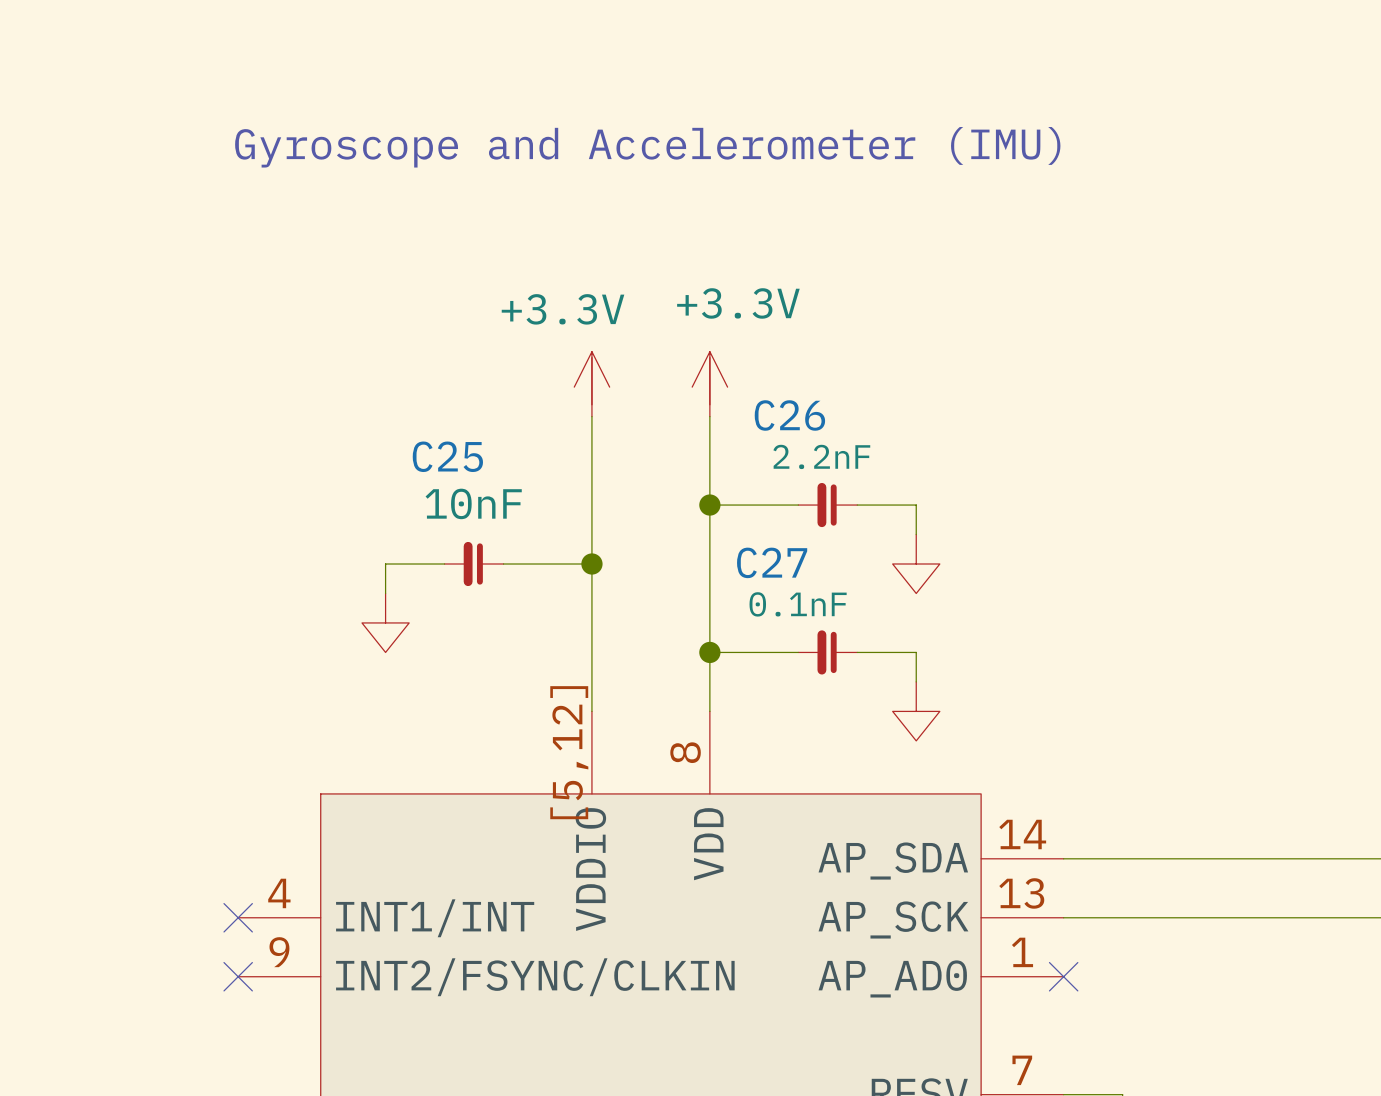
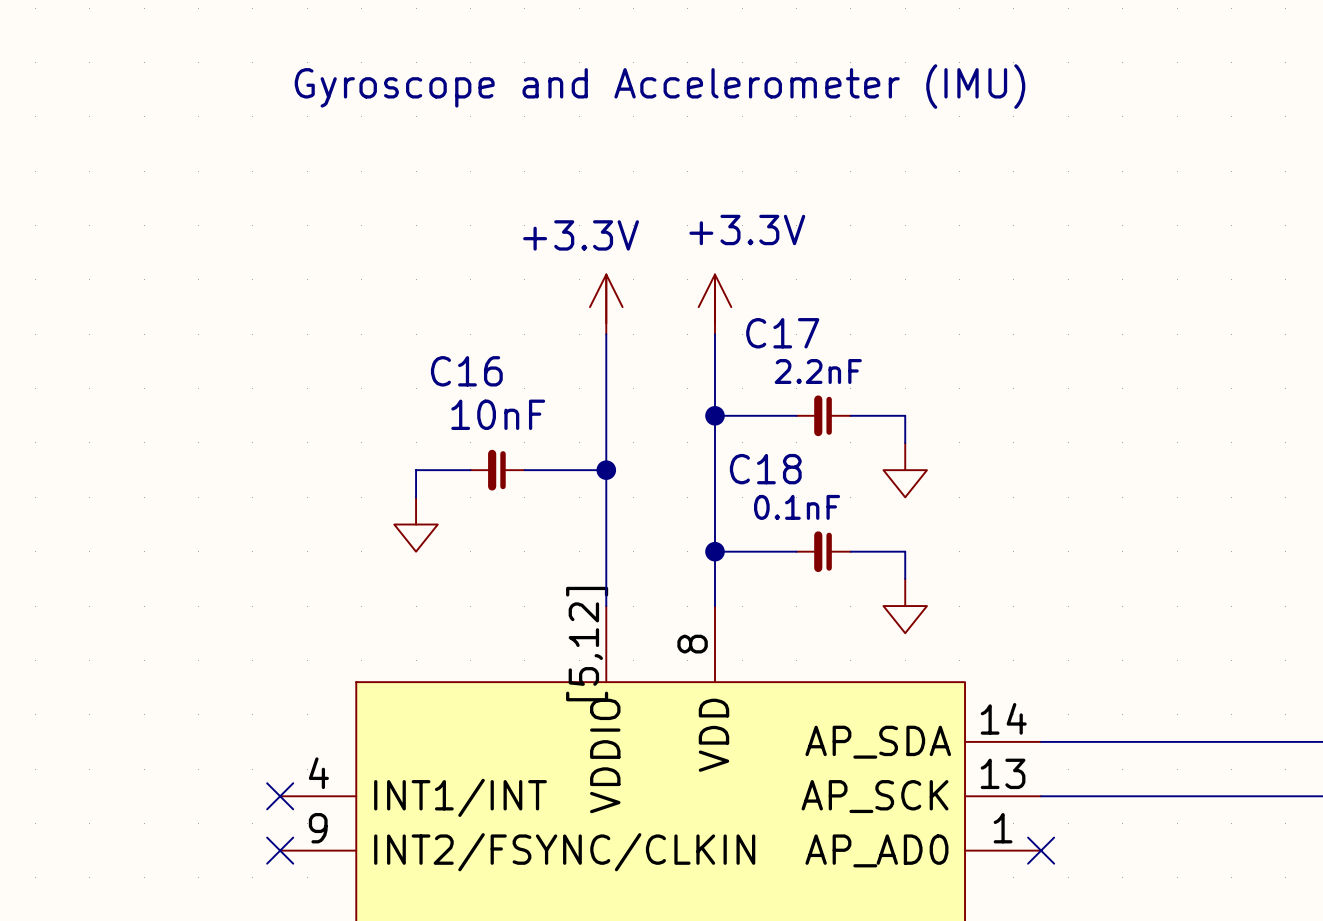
C26 name: C26 (789, 415) -> C17 (782, 333)
C25 name: C25 (447, 456) -> C16 (466, 371)
C27 name: C27 (772, 562) -> C18 (765, 469)

